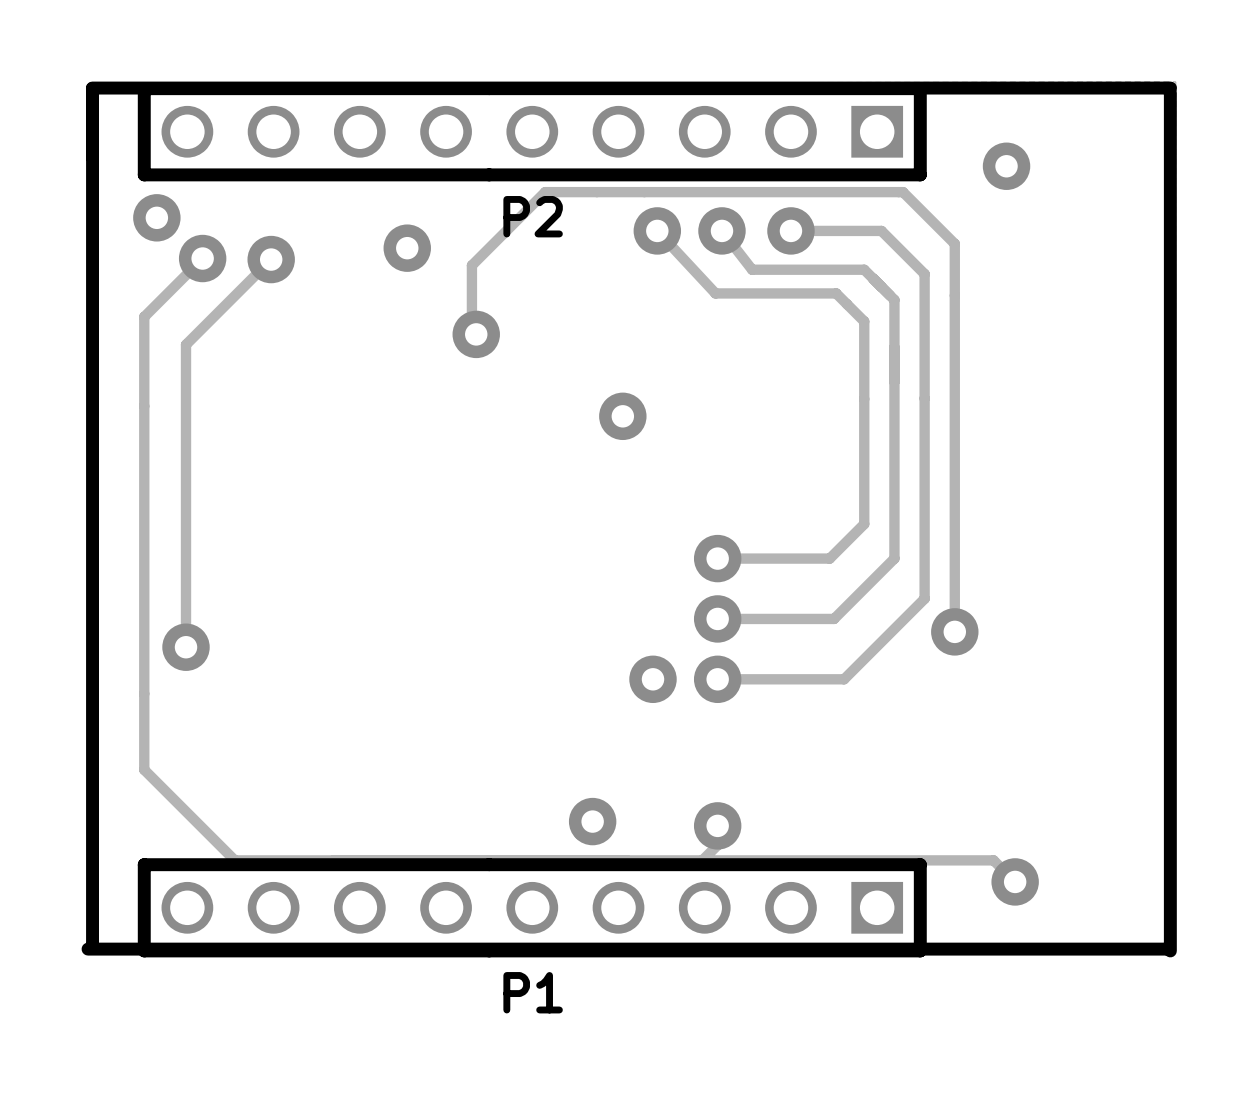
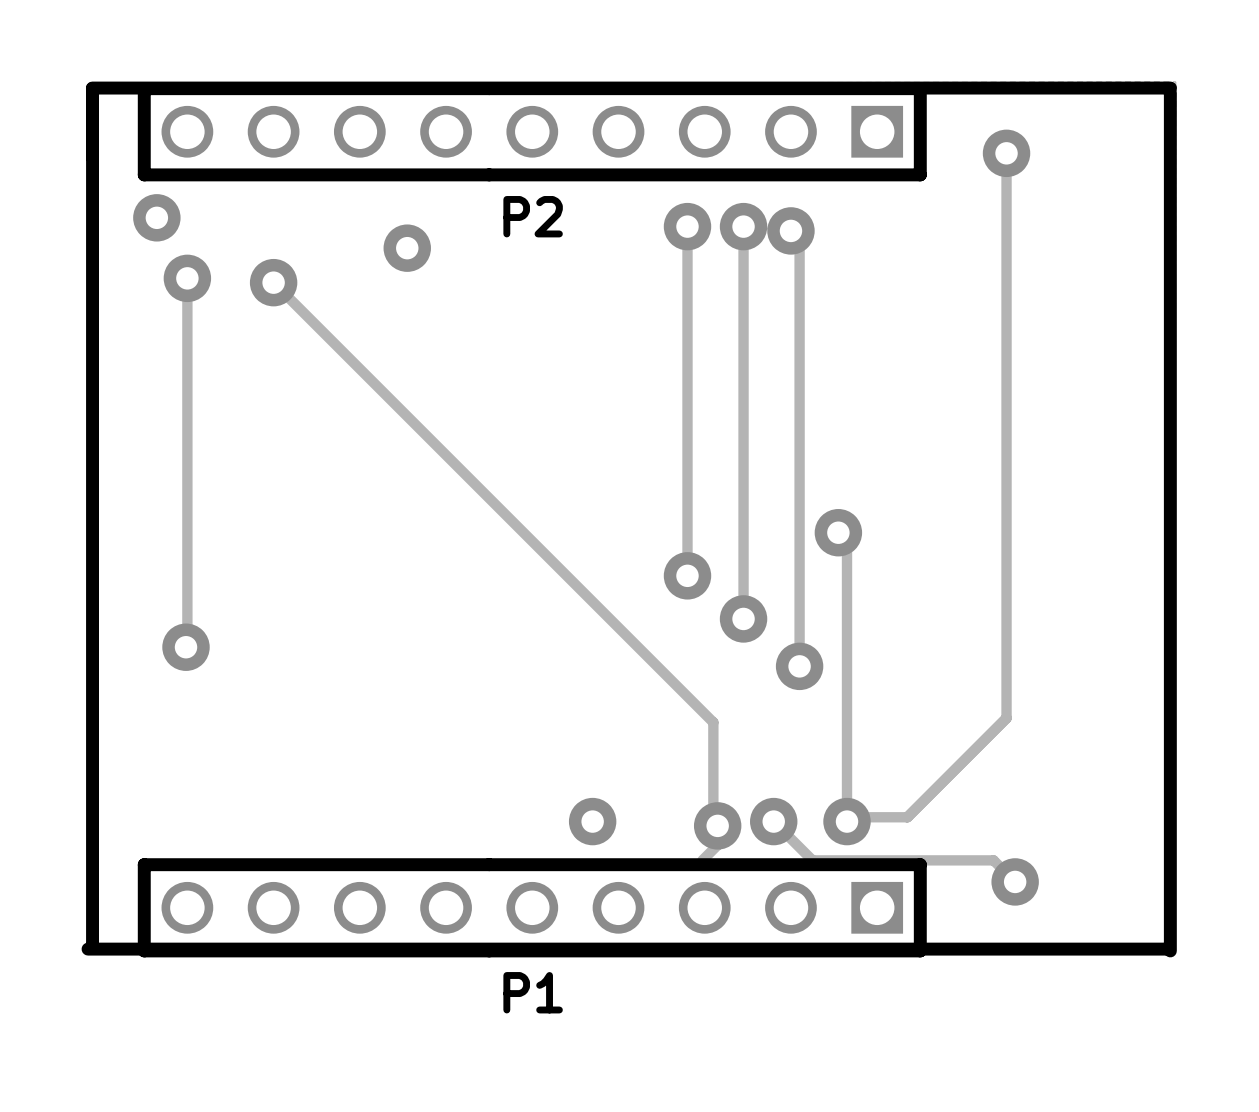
track: none -> (1006, 153) (1006, 718) (907, 817) (851, 817) (847, 821) (847, 541) (838, 532)
via position: (1006, 166) -> (1006, 153)
track: none -> (687, 226) (687, 575)
via: none -> (687, 226)
track: none -> (743, 226) (743, 618)
via: none -> (743, 226)
track: none -> (799, 226) (799, 666)
track: (657, 230) (715, 293) (836, 293) (864, 321) (864, 524) (829, 558) (717, 558) -> none
via: (657, 230) -> none
track: (721, 230) (752, 269) (864, 269) (894, 299) (894, 558) (834, 618) (717, 618) -> none
via: (721, 230) -> none
track: (790, 230) (881, 230) (924, 274) (924, 598) (844, 679) (717, 679) -> none
track: (202, 258) (144, 316) (144, 769) (234, 860) (812, 860) -> (773, 821) (812, 860)
via position: (202, 258) -> (187, 278)
track: (271, 259) (186, 344) (186, 647) -> (187, 278) (186, 647)
via position: (271, 259) -> (273, 282)
track: none -> (273, 282) (713, 722) (713, 821)
track: (476, 334) (471, 330) (471, 265) (545, 192) (903, 192) (954, 243) (954, 631) -> none
via: (476, 334) -> none
via: (622, 416) -> none
via: none -> (838, 532)
via: (717, 558) -> none
via: none -> (687, 575)
via position: (717, 618) -> (743, 618)
via: (954, 631) -> none
via: none -> (799, 666)
via: (653, 679) -> none
via: (717, 679) -> none
via: none -> (773, 821)
via: none -> (847, 821)

